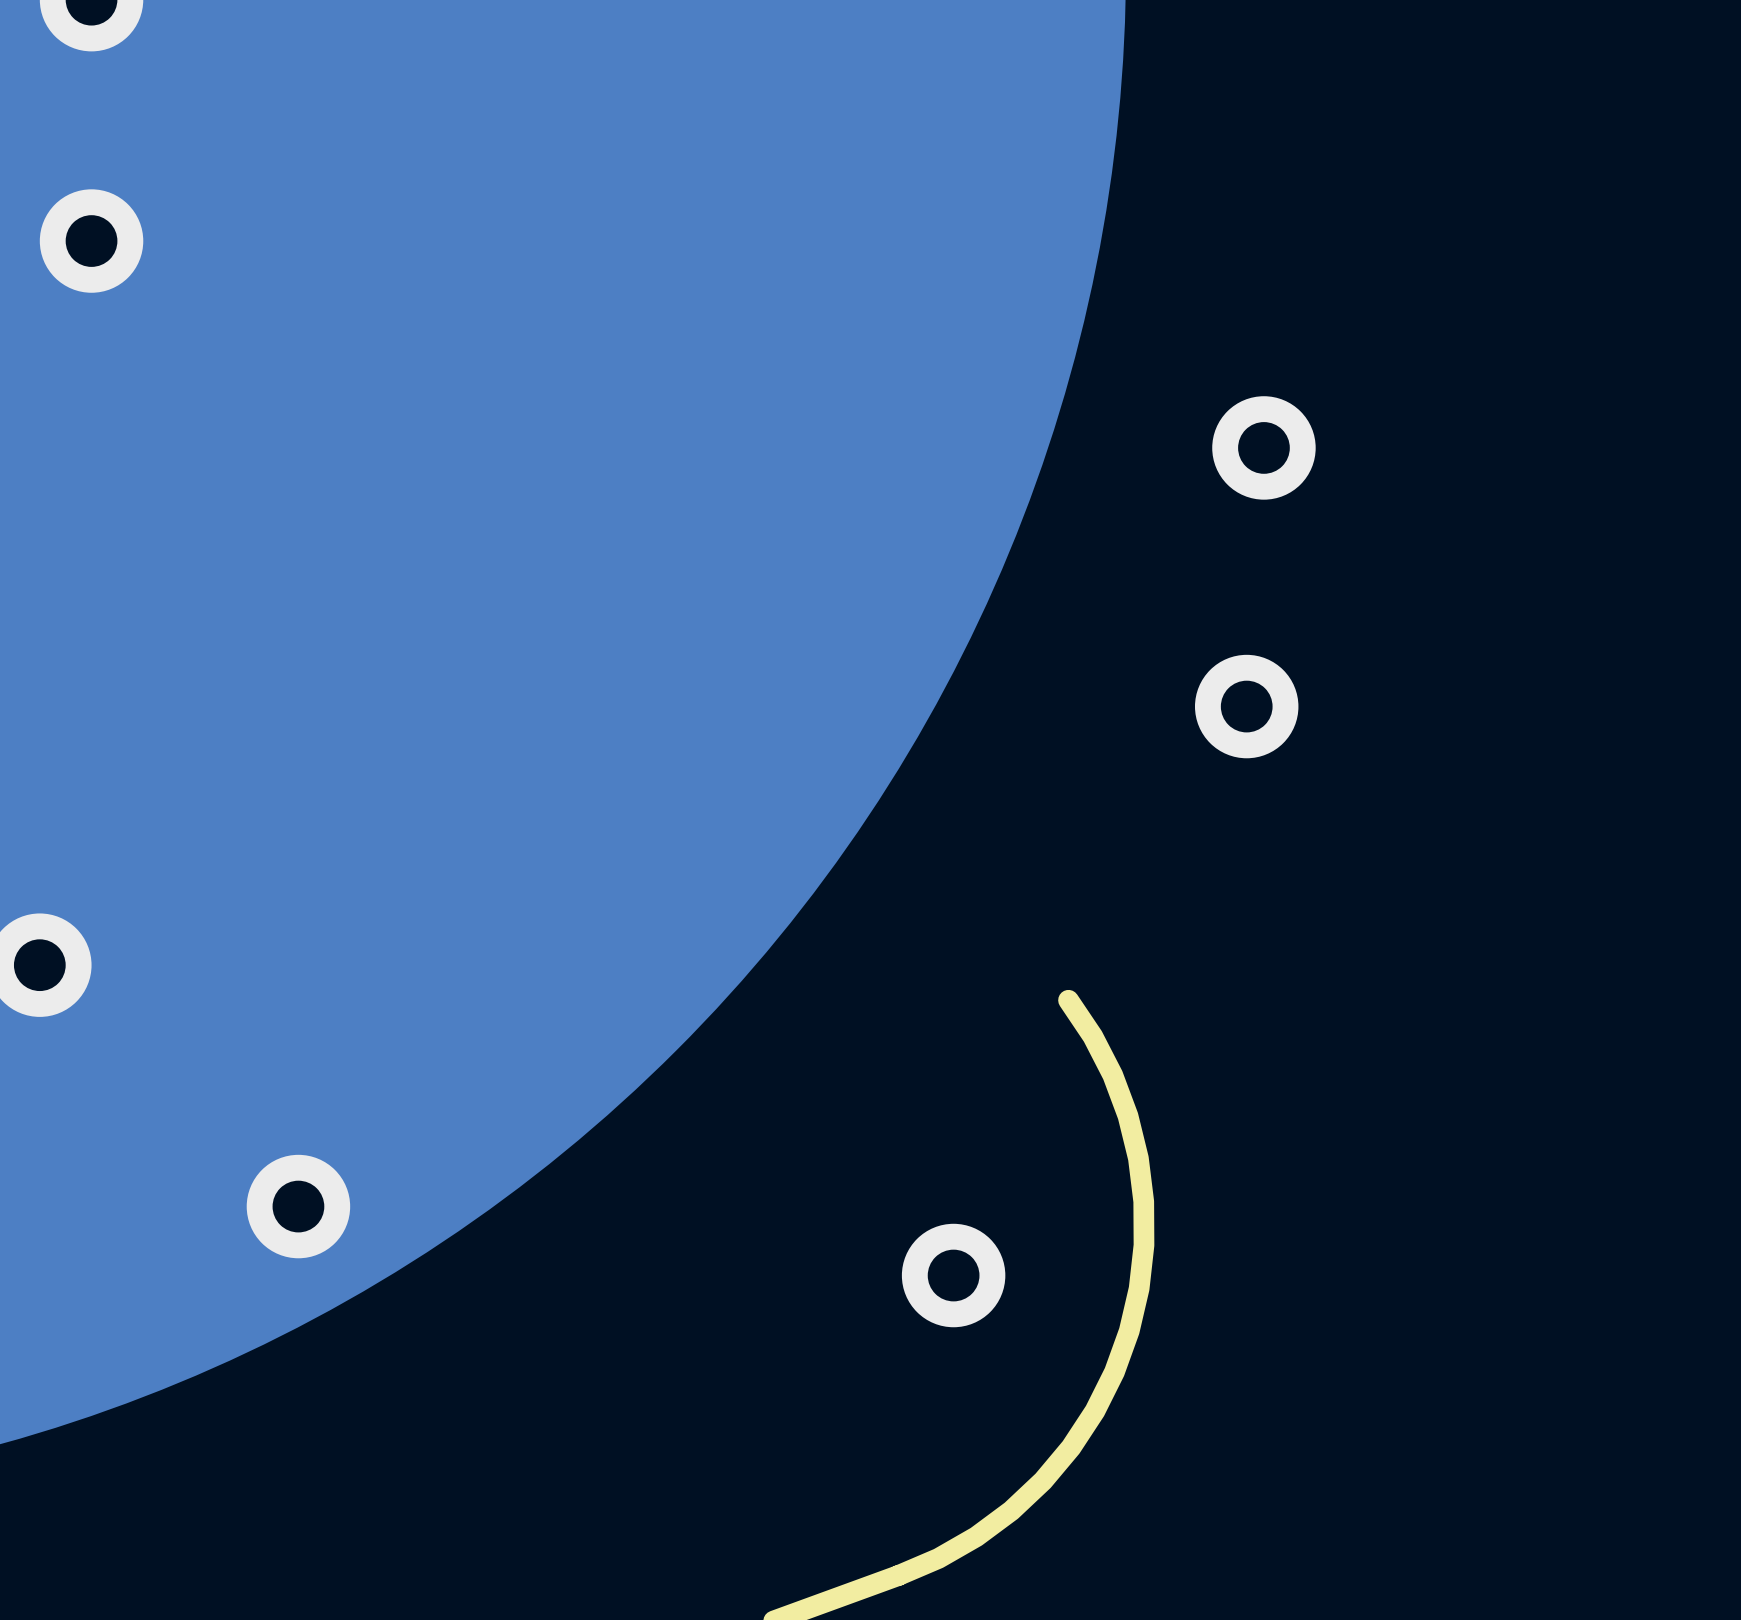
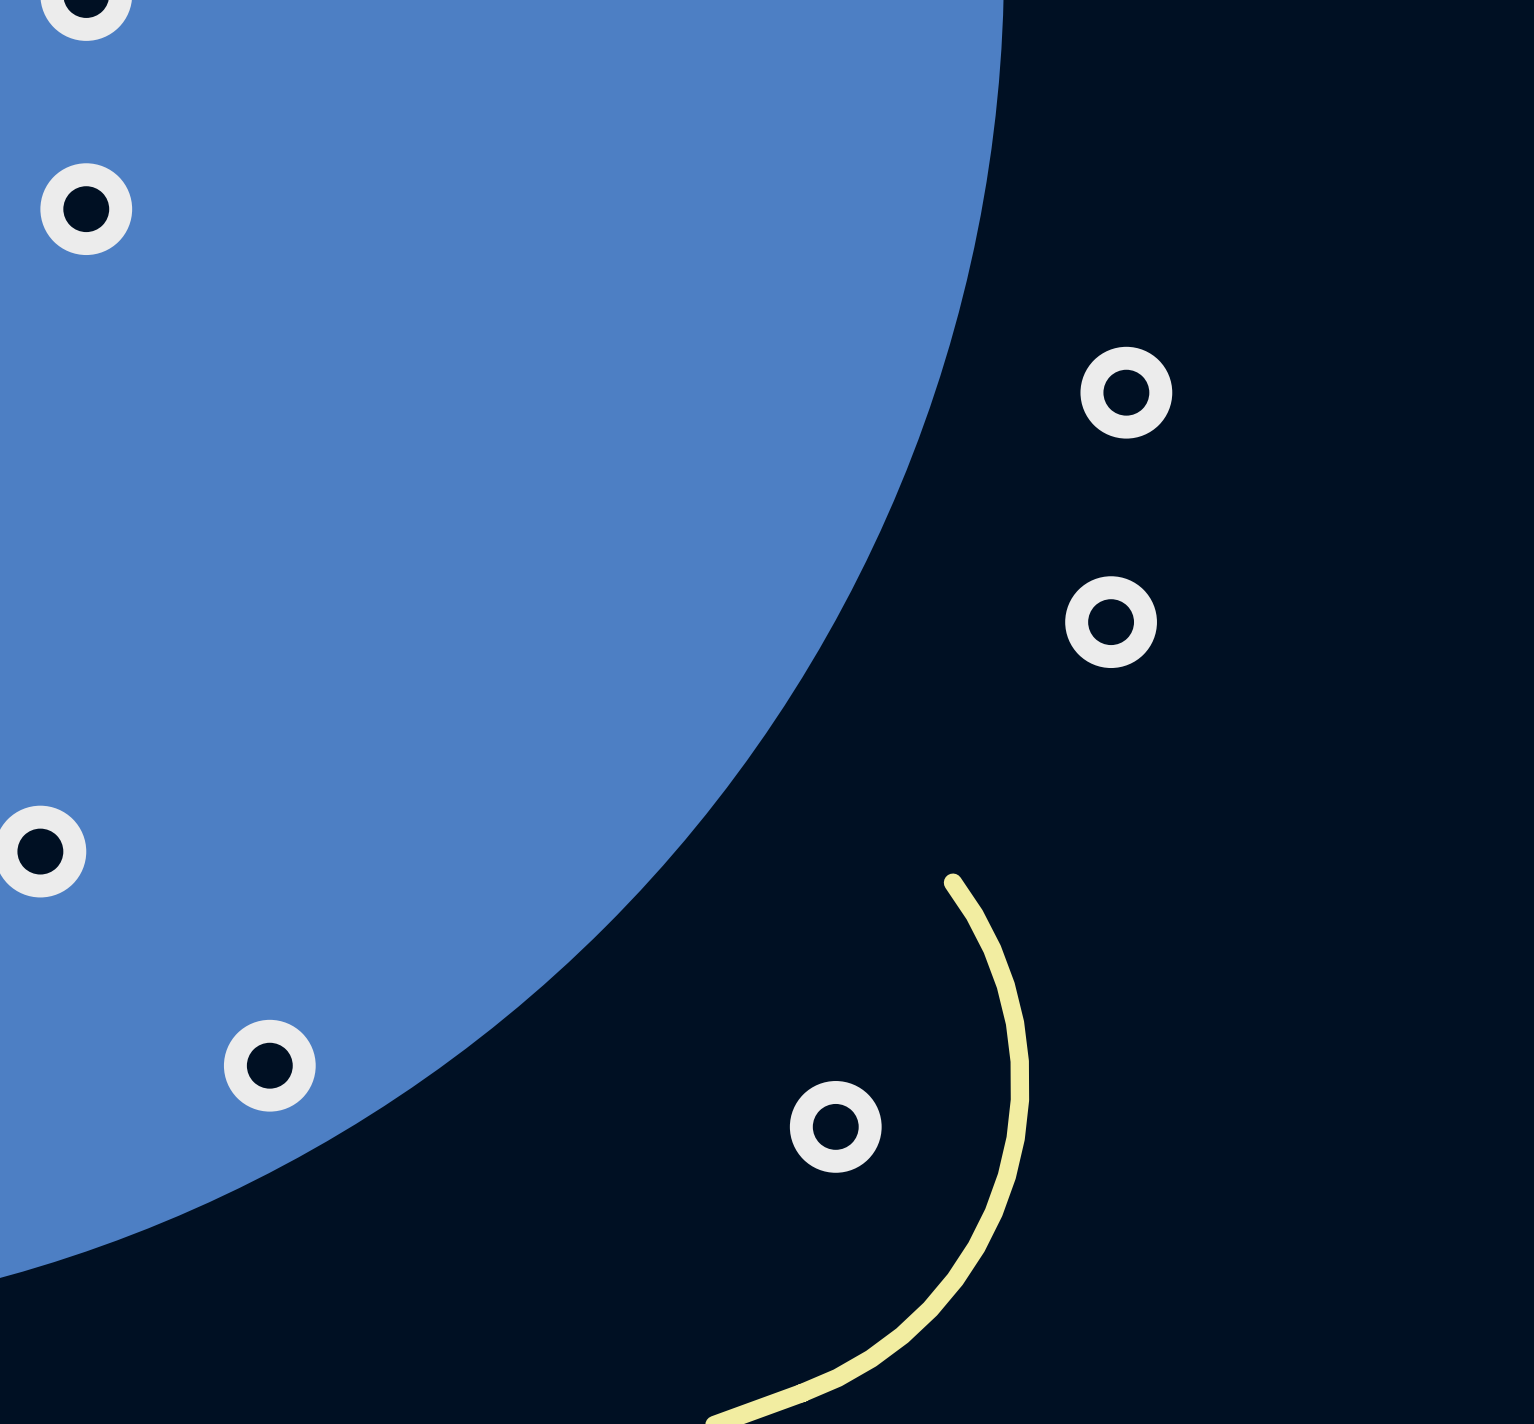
via position: (953, 1275) -> (835, 1126)

